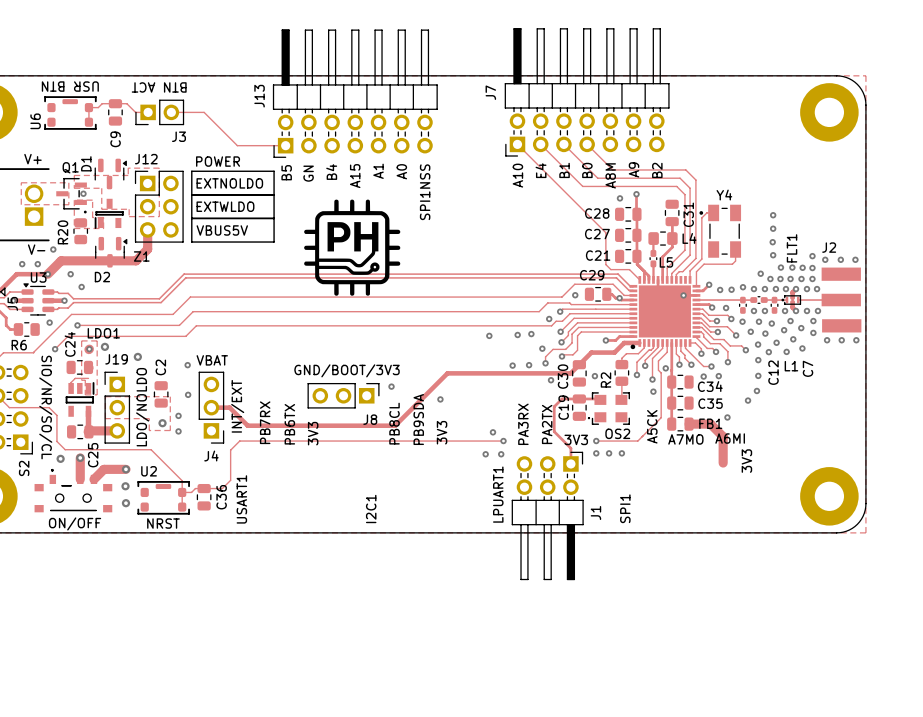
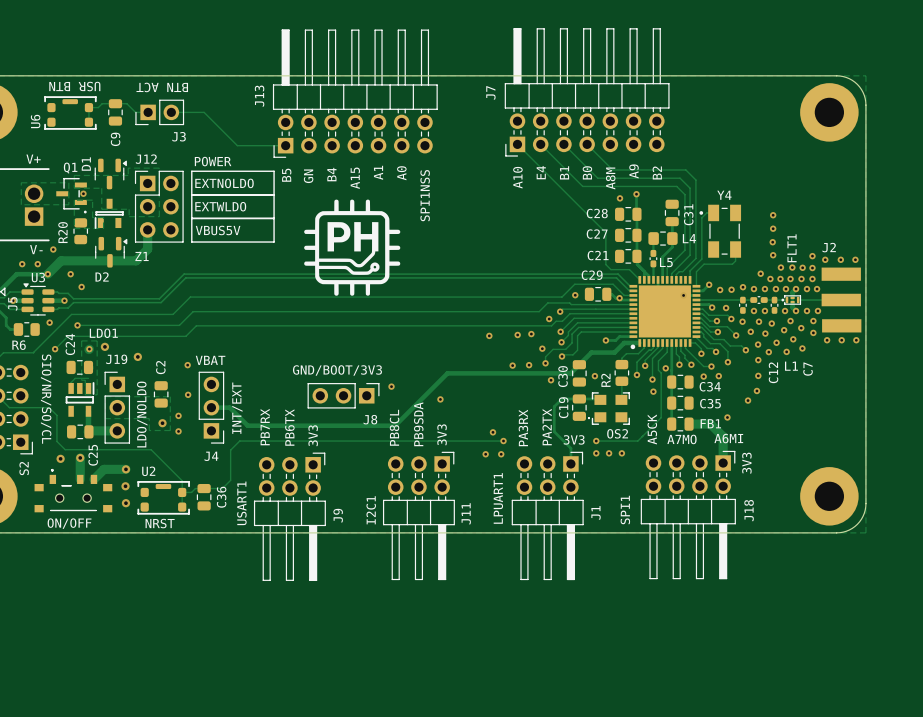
J11: none -> (418, 515)
J18: none -> (688, 515)
J9: none -> (289, 516)

